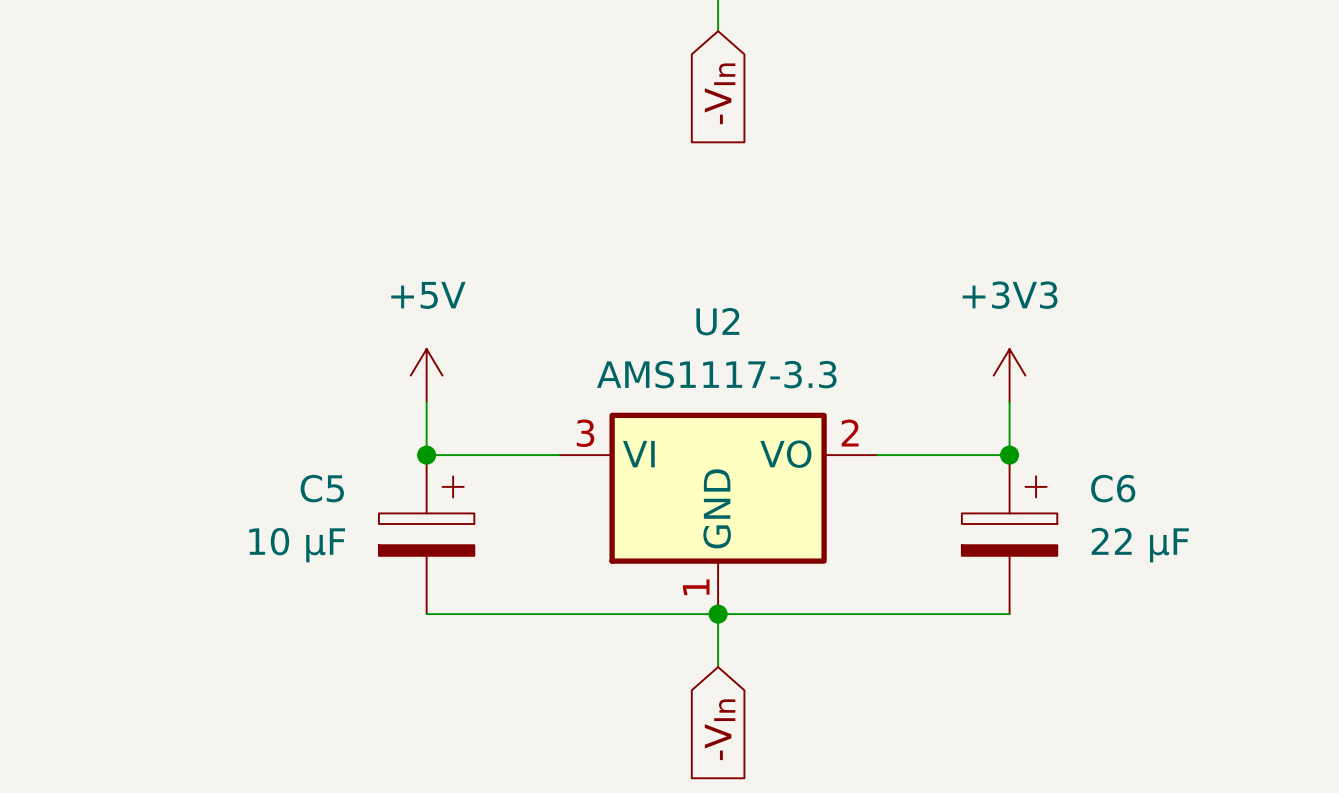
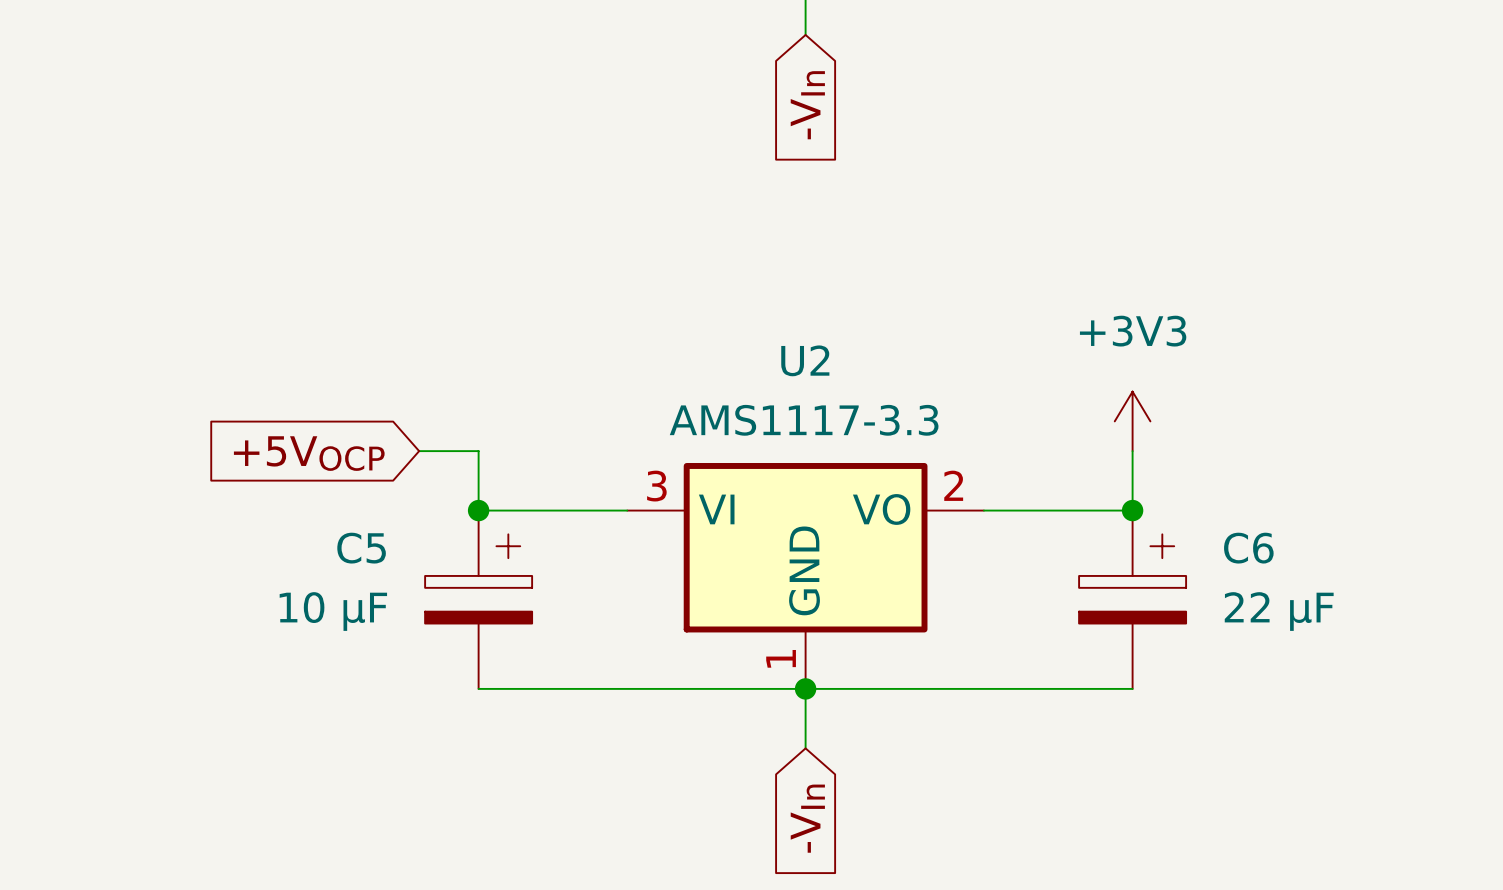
power symbol: +5V (426, 375) -> none
wire: none -> (419, 451) (478, 451)
global label: none -> +5VOCP (309, 453)

